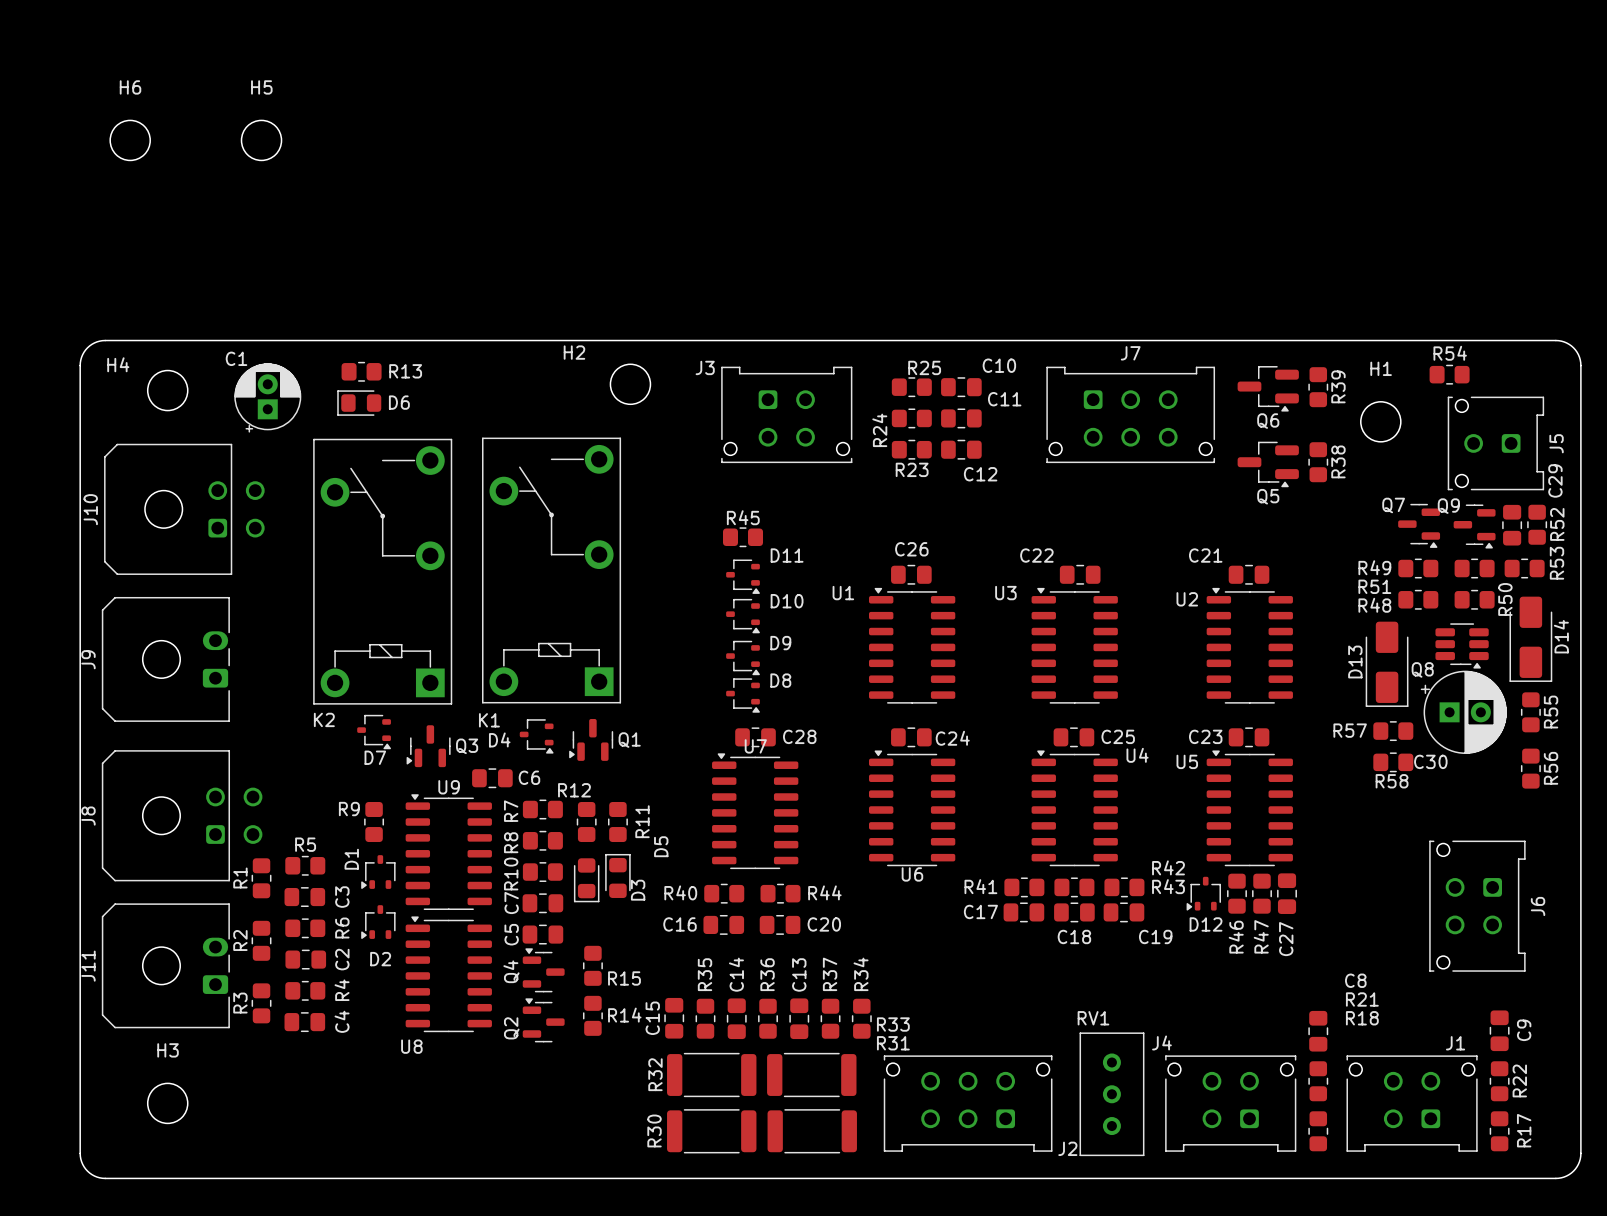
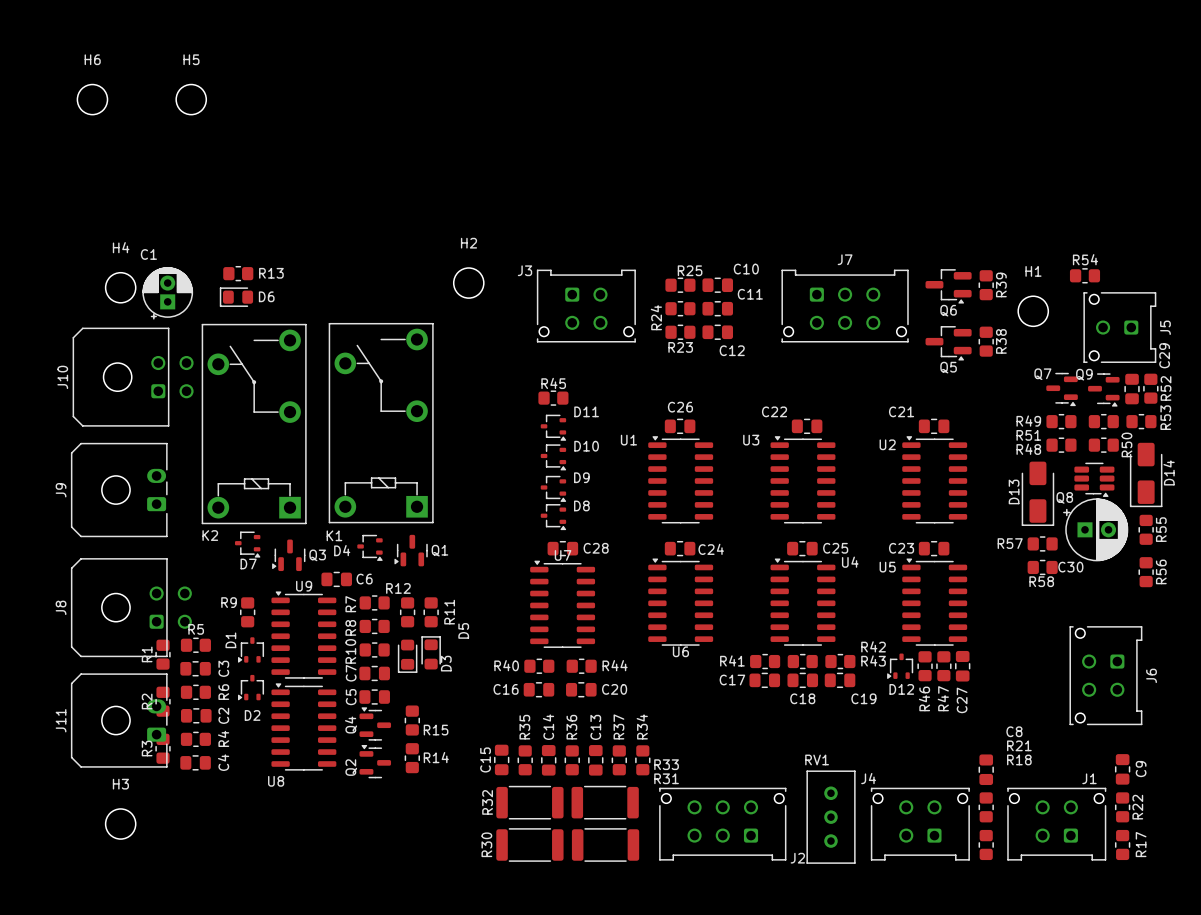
board edge: (105, 340) (1555, 340) (1569, 344) (1578, 354) (1580, 365) (1580, 1153) (1577, 1166) (1566, 1175) (1555, 1178) (105, 1178) (91, 1174) (82, 1164) (80, 1153) (80, 365) (81, 357) (87, 347) (96, 341) (105, 340) -> none
H2 name position: H2 (574, 352) -> H2 (468, 243)
C1 name position: C1 (236, 358) -> C1 (148, 254)
H4 name position: H4 (118, 364) -> H4 (121, 247)
R13 position: (361, 371) -> (238, 273)
C1 position: (267, 397) -> (167, 293)
D6 position: (359, 403) -> (236, 297)
K1 position: (551, 570) -> (381, 423)
K2 position: (382, 571) -> (254, 424)
D7 position: (374, 732) -> (247, 544)
D4 position: (536, 736) -> (369, 547)
Q1 position: (591, 739) -> (411, 550)
Q3 position: (428, 746) -> (288, 555)
C6 position: (492, 778) -> (336, 579)
R7 position: (542, 809) -> (374, 602)
R9 position: (374, 822) -> (247, 612)
R12 position: (586, 822) -> (407, 612)
R11 position: (617, 822) -> (431, 612)
R8 position: (542, 840) -> (374, 626)
U9 position: (448, 852) -> (303, 634)
R5 position: (305, 865) -> (195, 645)
D1 position: (378, 872) -> (250, 649)
R10 position: (542, 872) -> (374, 649)
D3 position: (617, 875) -> (431, 652)
R1 position: (261, 878) -> (163, 654)
D5 position: (586, 880) -> (407, 656)
C3 position: (304, 897) -> (195, 668)
C7 position: (542, 903) -> (374, 673)
D2 position: (378, 922) -> (250, 687)
R6 position: (305, 928) -> (195, 692)
C5 position: (542, 934) -> (374, 697)
R2 position: (261, 940) -> (163, 701)
C2 position: (305, 959) -> (196, 715)
R15 position: (592, 965) -> (412, 720)
Q4 position: (543, 970) -> (375, 723)
U8 position: (448, 974) -> (303, 726)
R4 position: (305, 990) -> (195, 739)
R3 position: (261, 1003) -> (163, 748)
R14 position: (592, 1015) -> (412, 758)
Q2 position: (543, 1020) -> (375, 761)
C4 position: (304, 1022) -> (195, 762)

